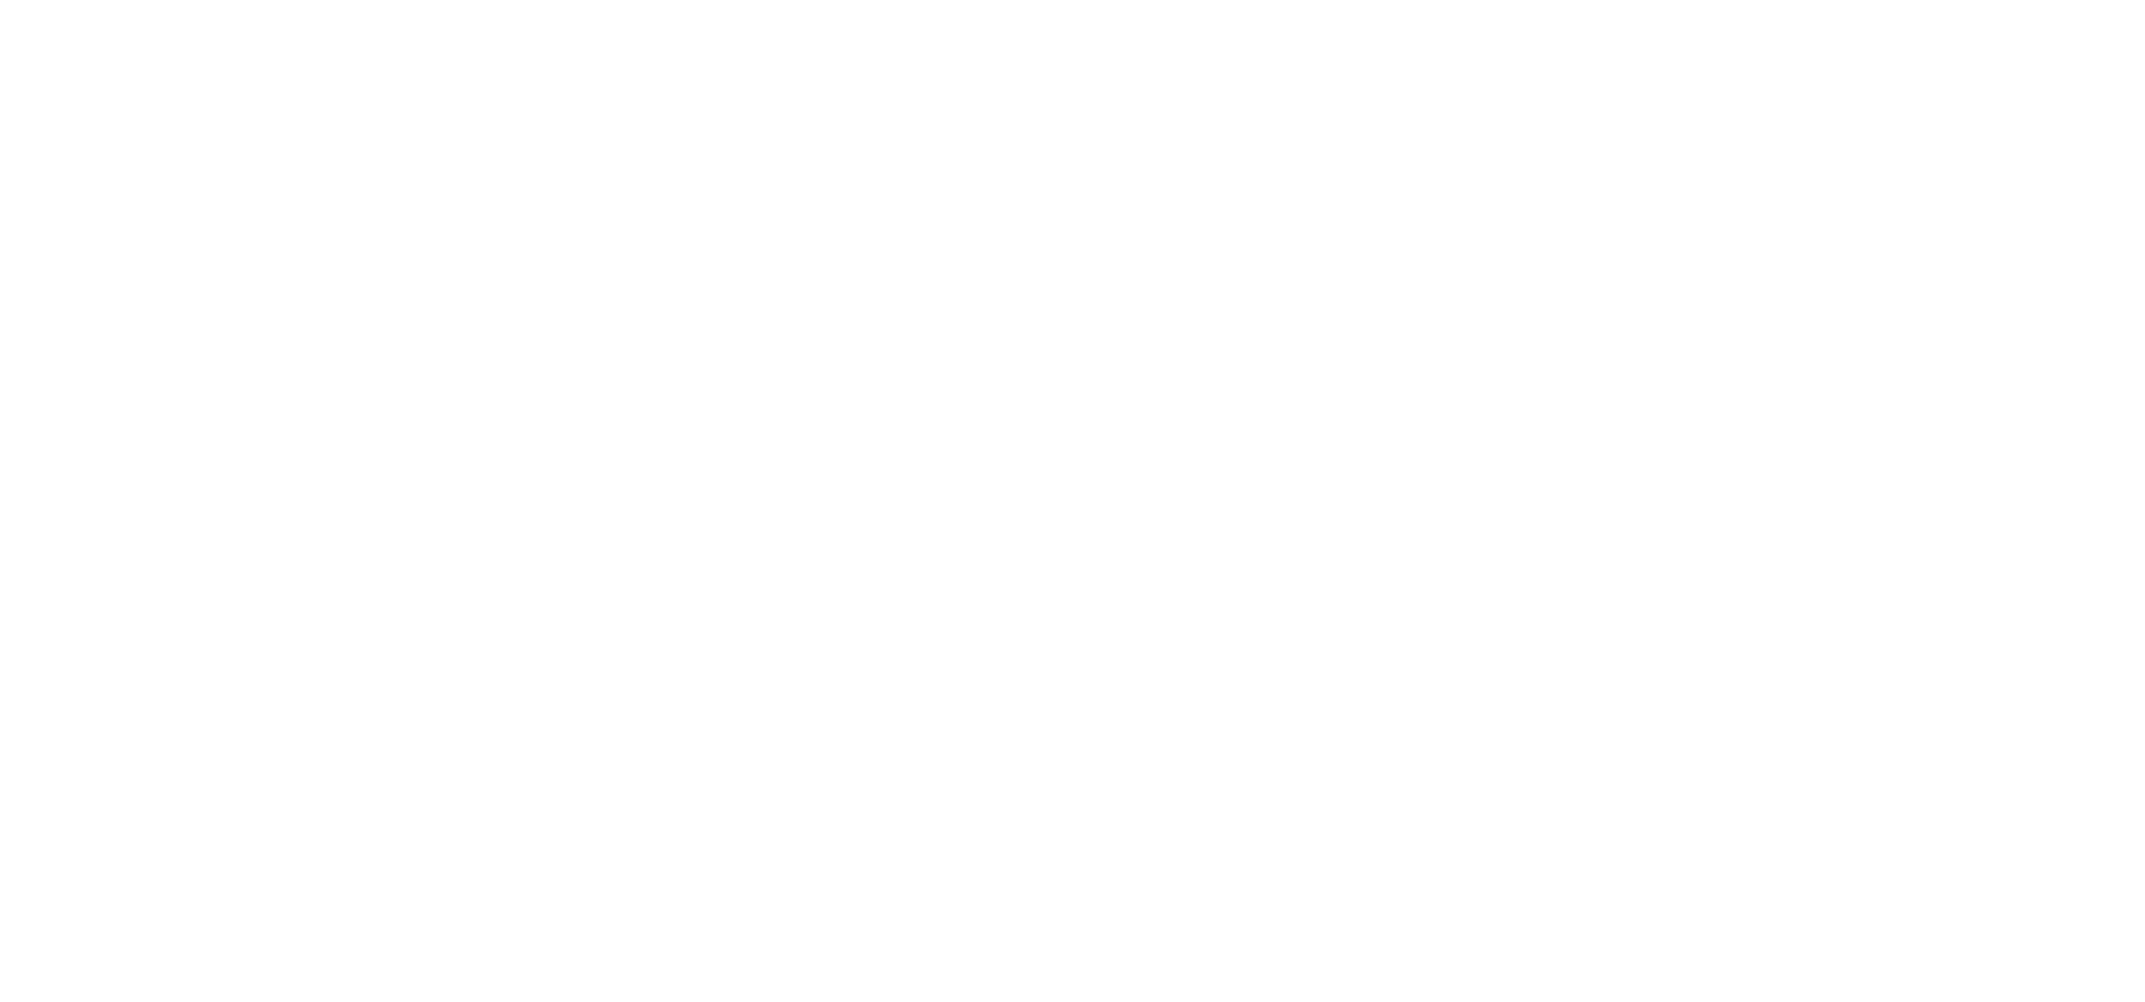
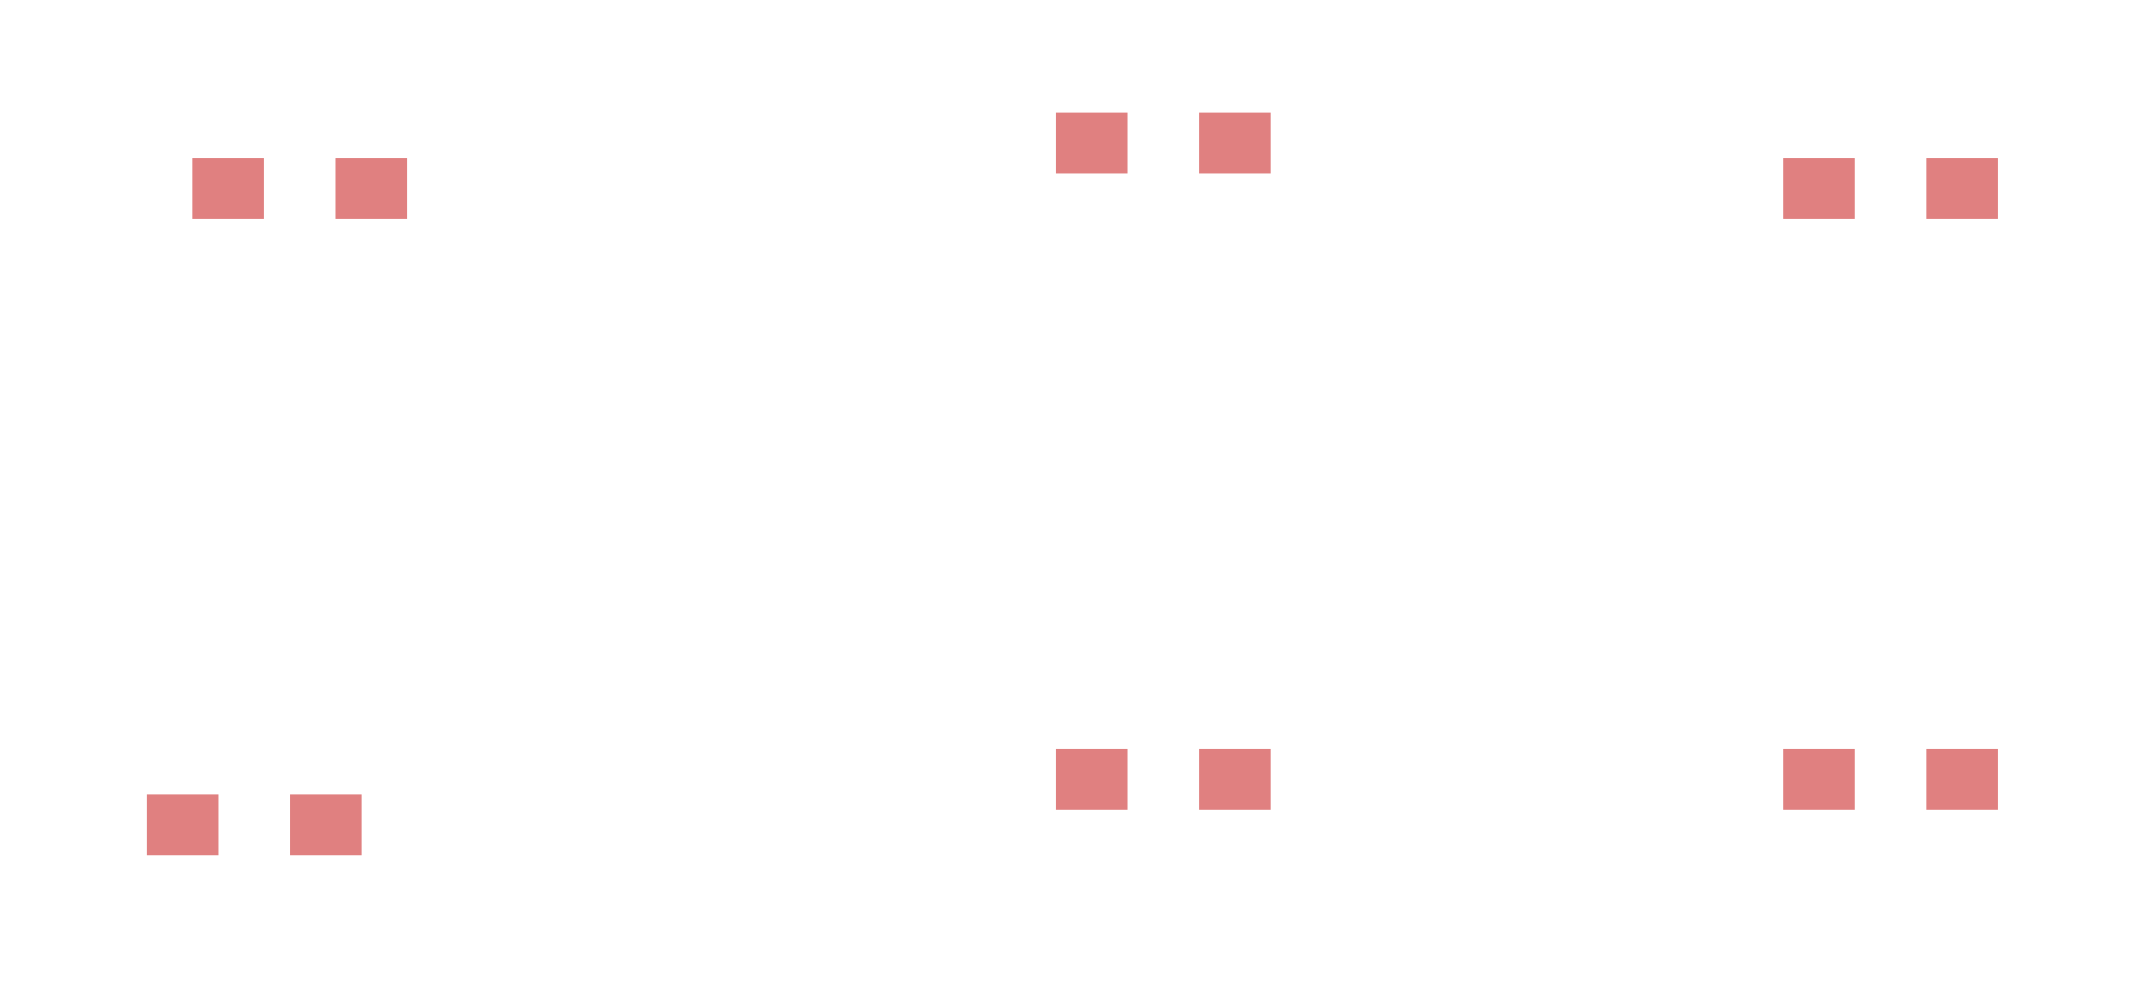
part: none -> (1163, 143)
part: none -> (299, 188)
part: none -> (1890, 188)
part: none -> (1163, 779)
part: none -> (1890, 779)
part: none -> (254, 824)

